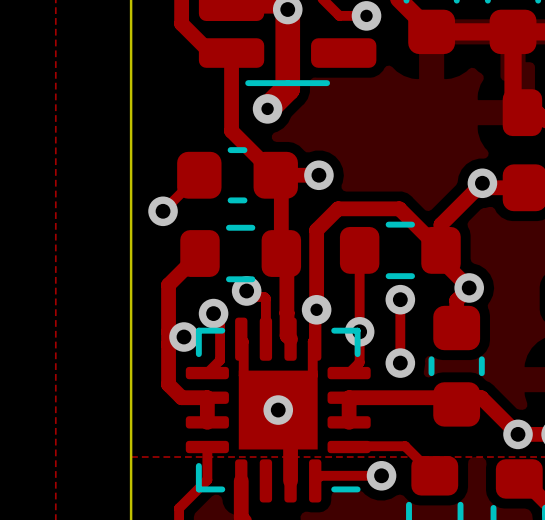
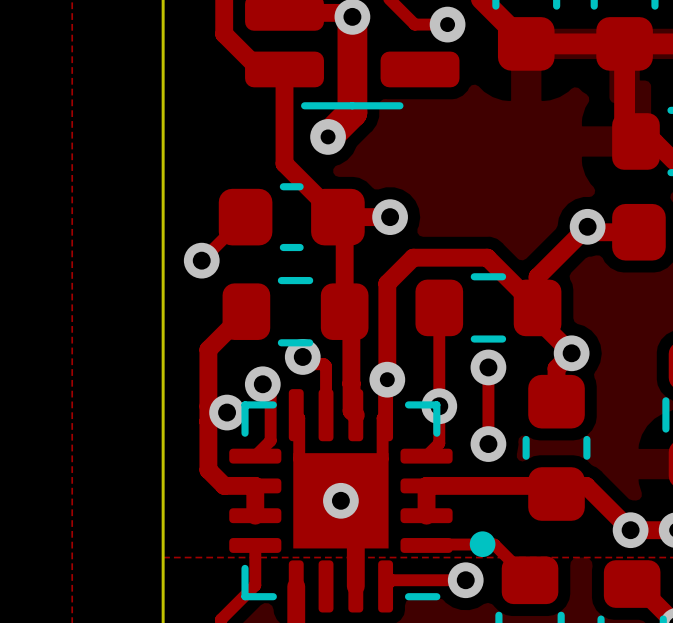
drawing: none -> [469, 531, 496, 558]

